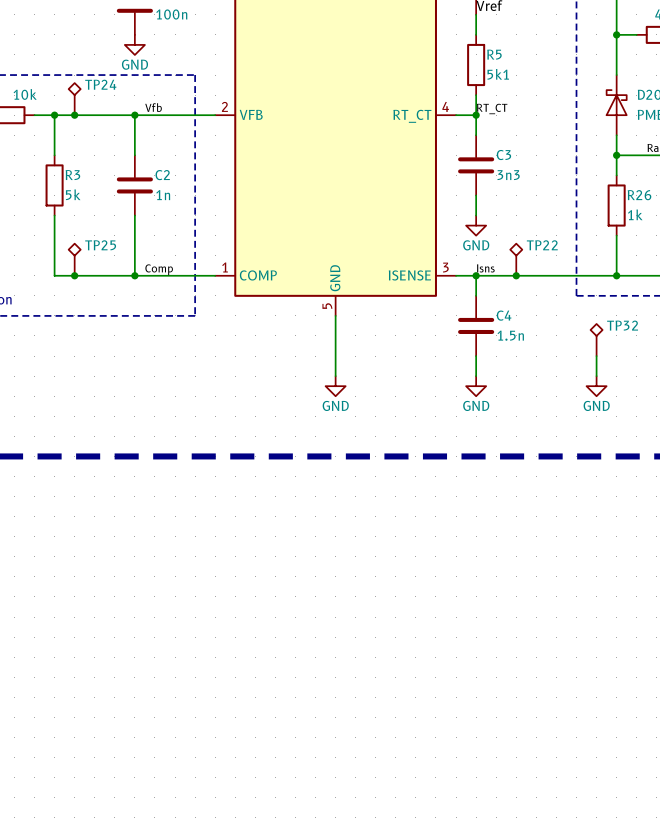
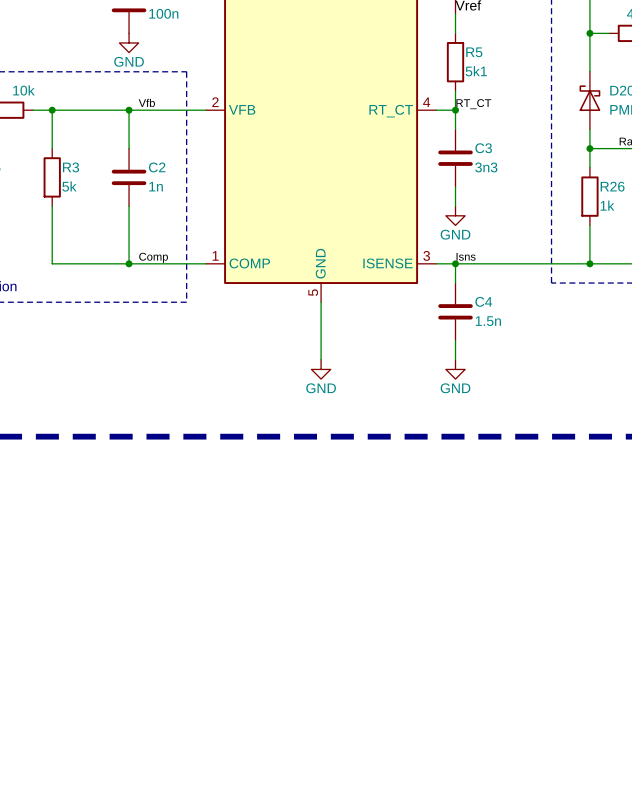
TP24: (74, 99) -> none
junction: (74, 115) -> none
TP25: (74, 259) -> none
TP22: (516, 259) -> none
junction: (74, 275) -> none
junction: (516, 275) -> none
TP32: (596, 340) -> none
wire: (596, 356) (596, 376) -> none
power symbol: GND (596, 386) -> none

